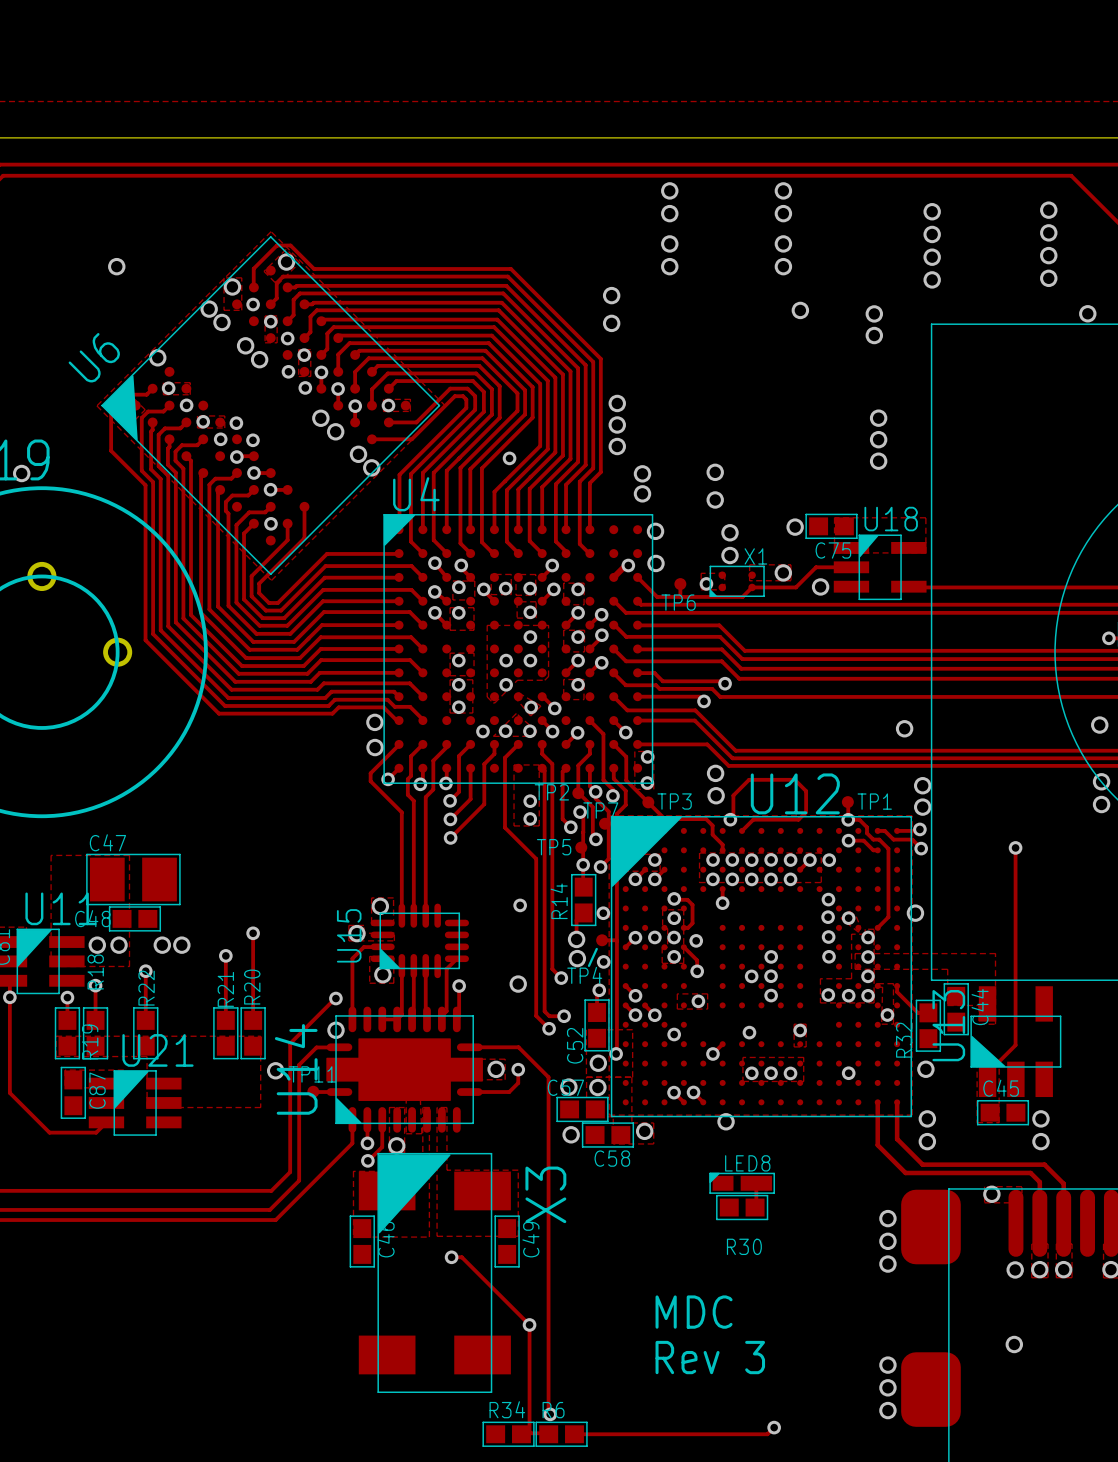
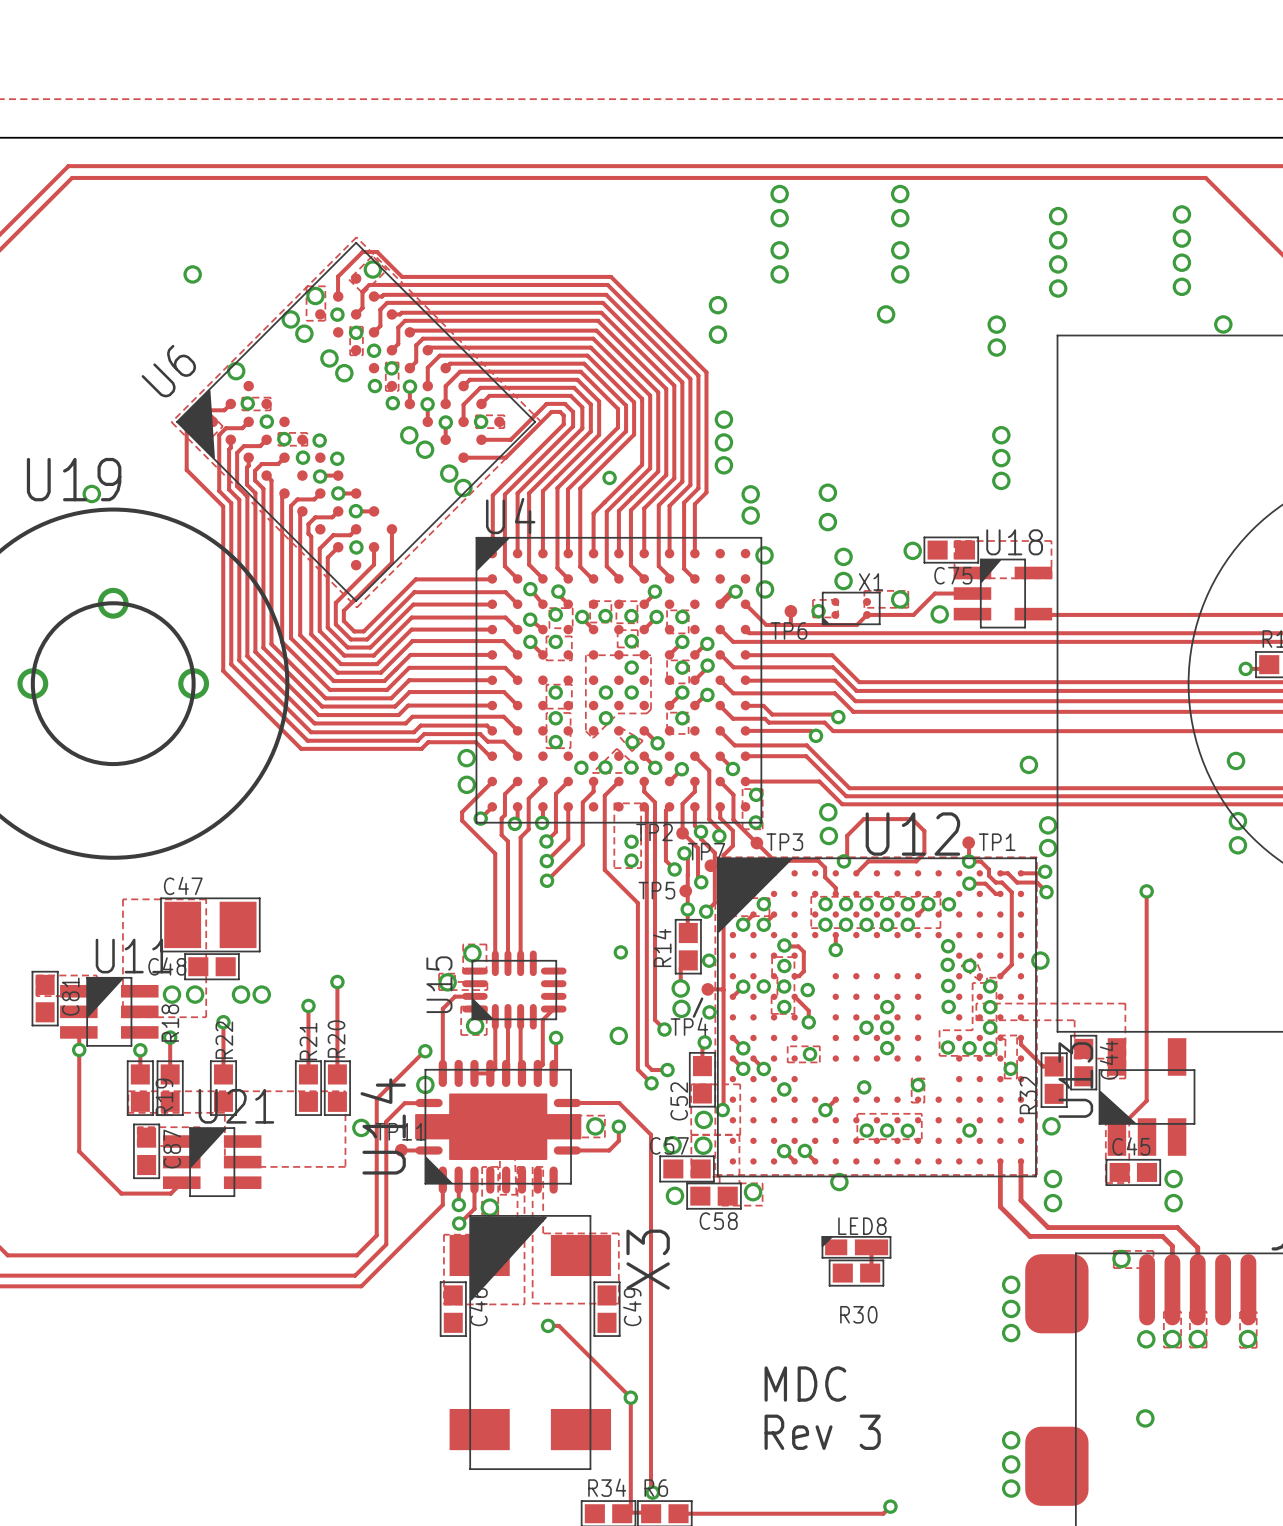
via position: (800, 310) -> (886, 314)

